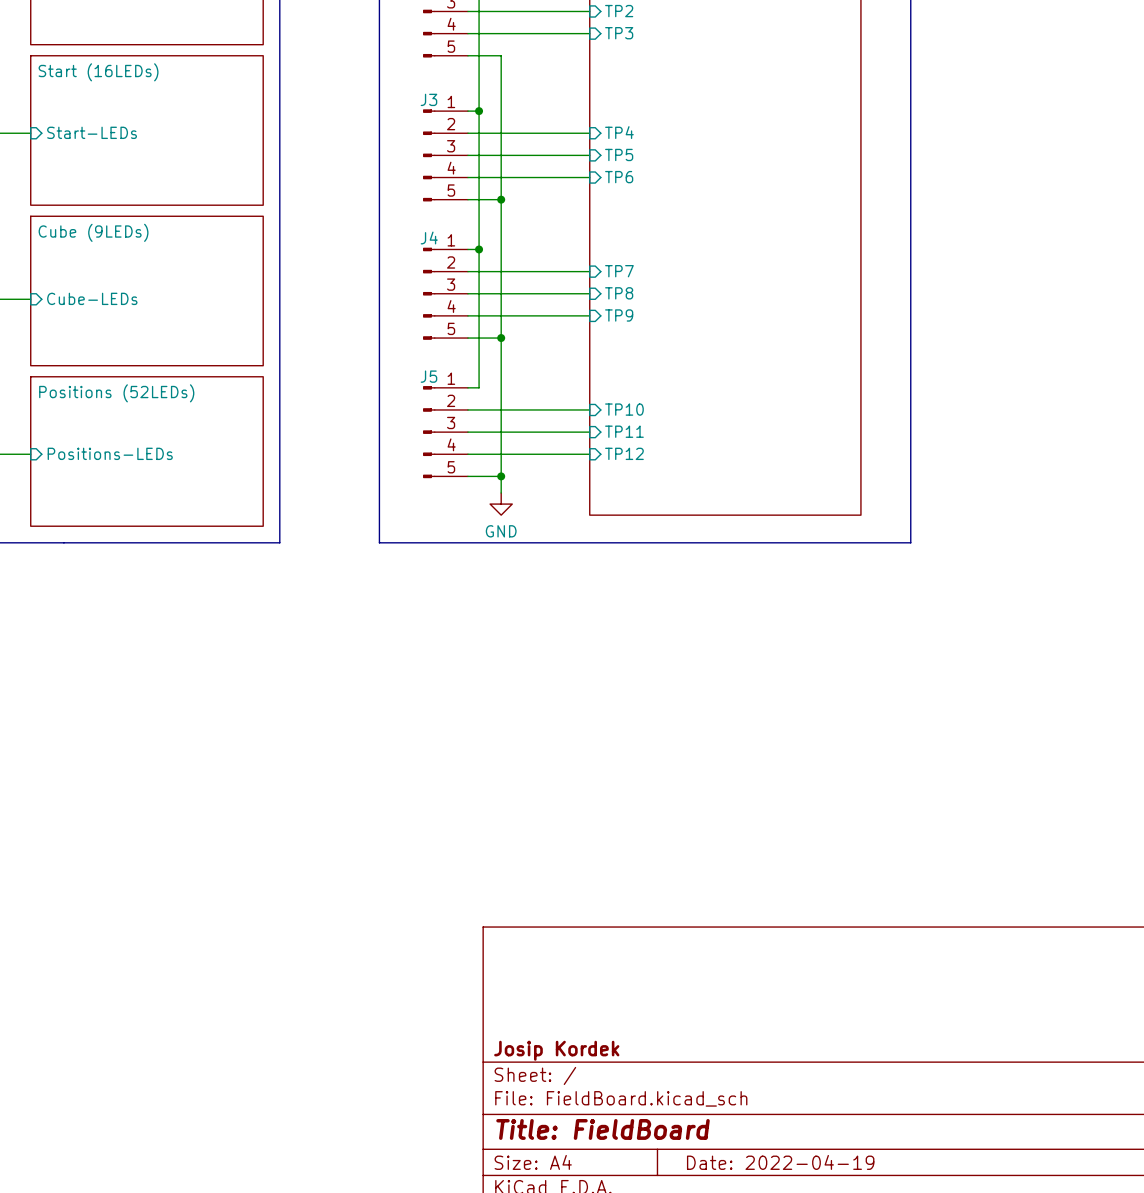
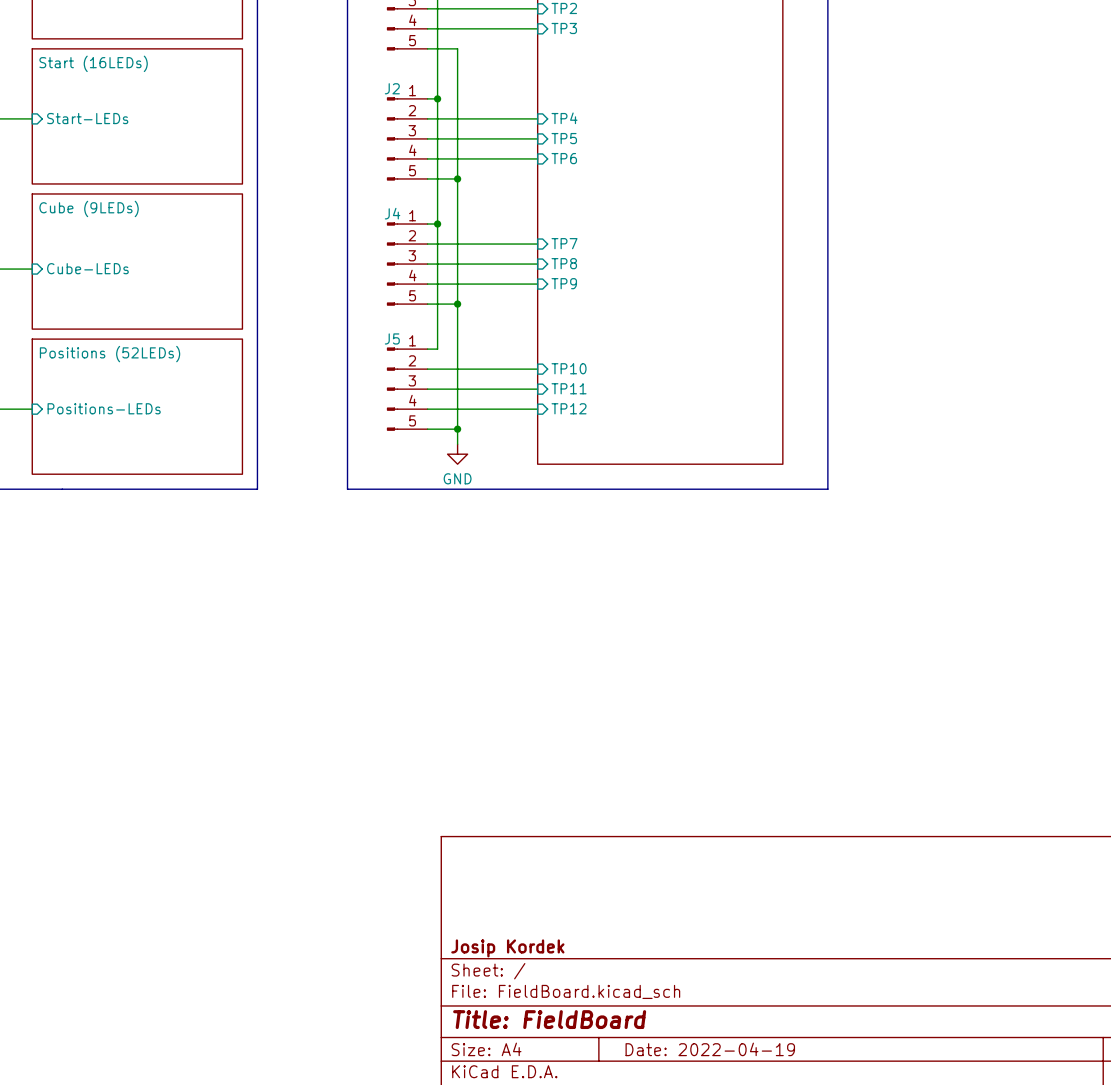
J3 name: J3 (428, 99) -> J2 (392, 88)

